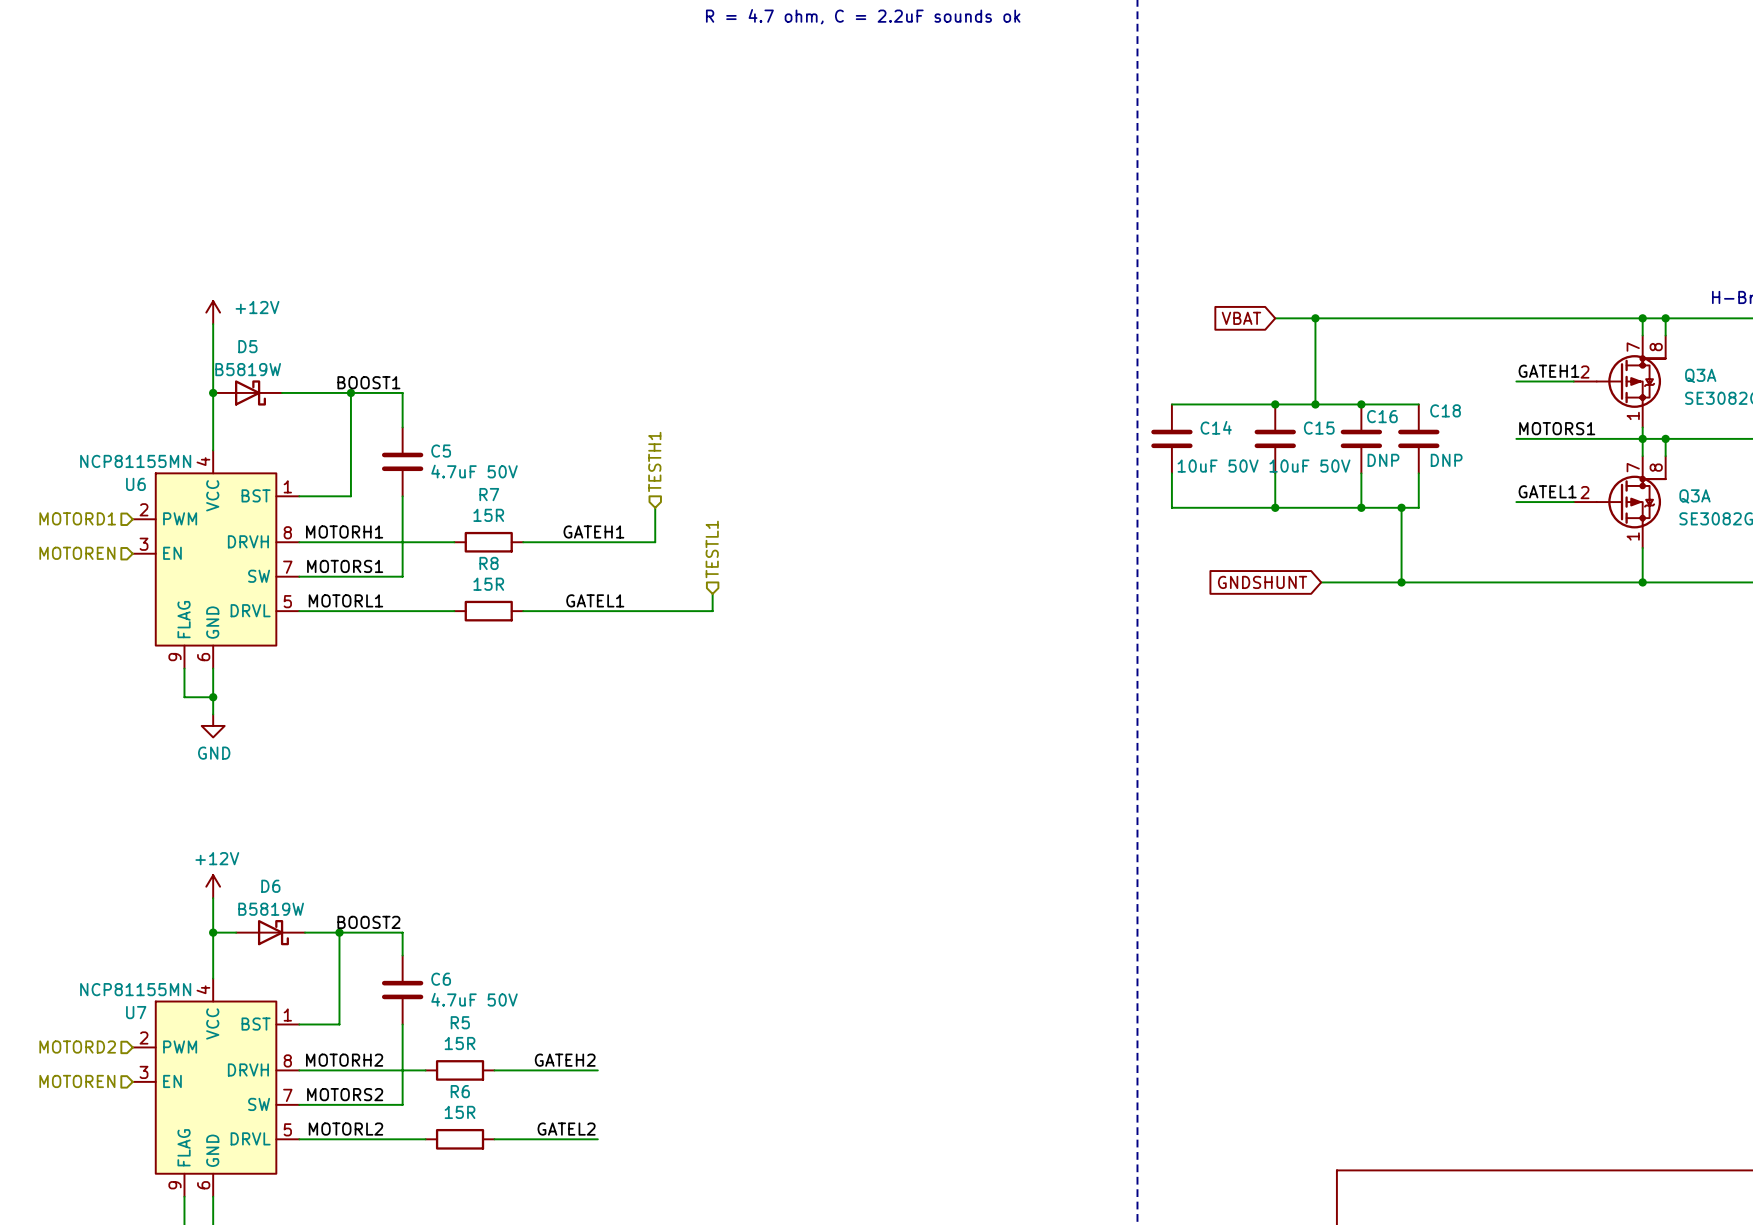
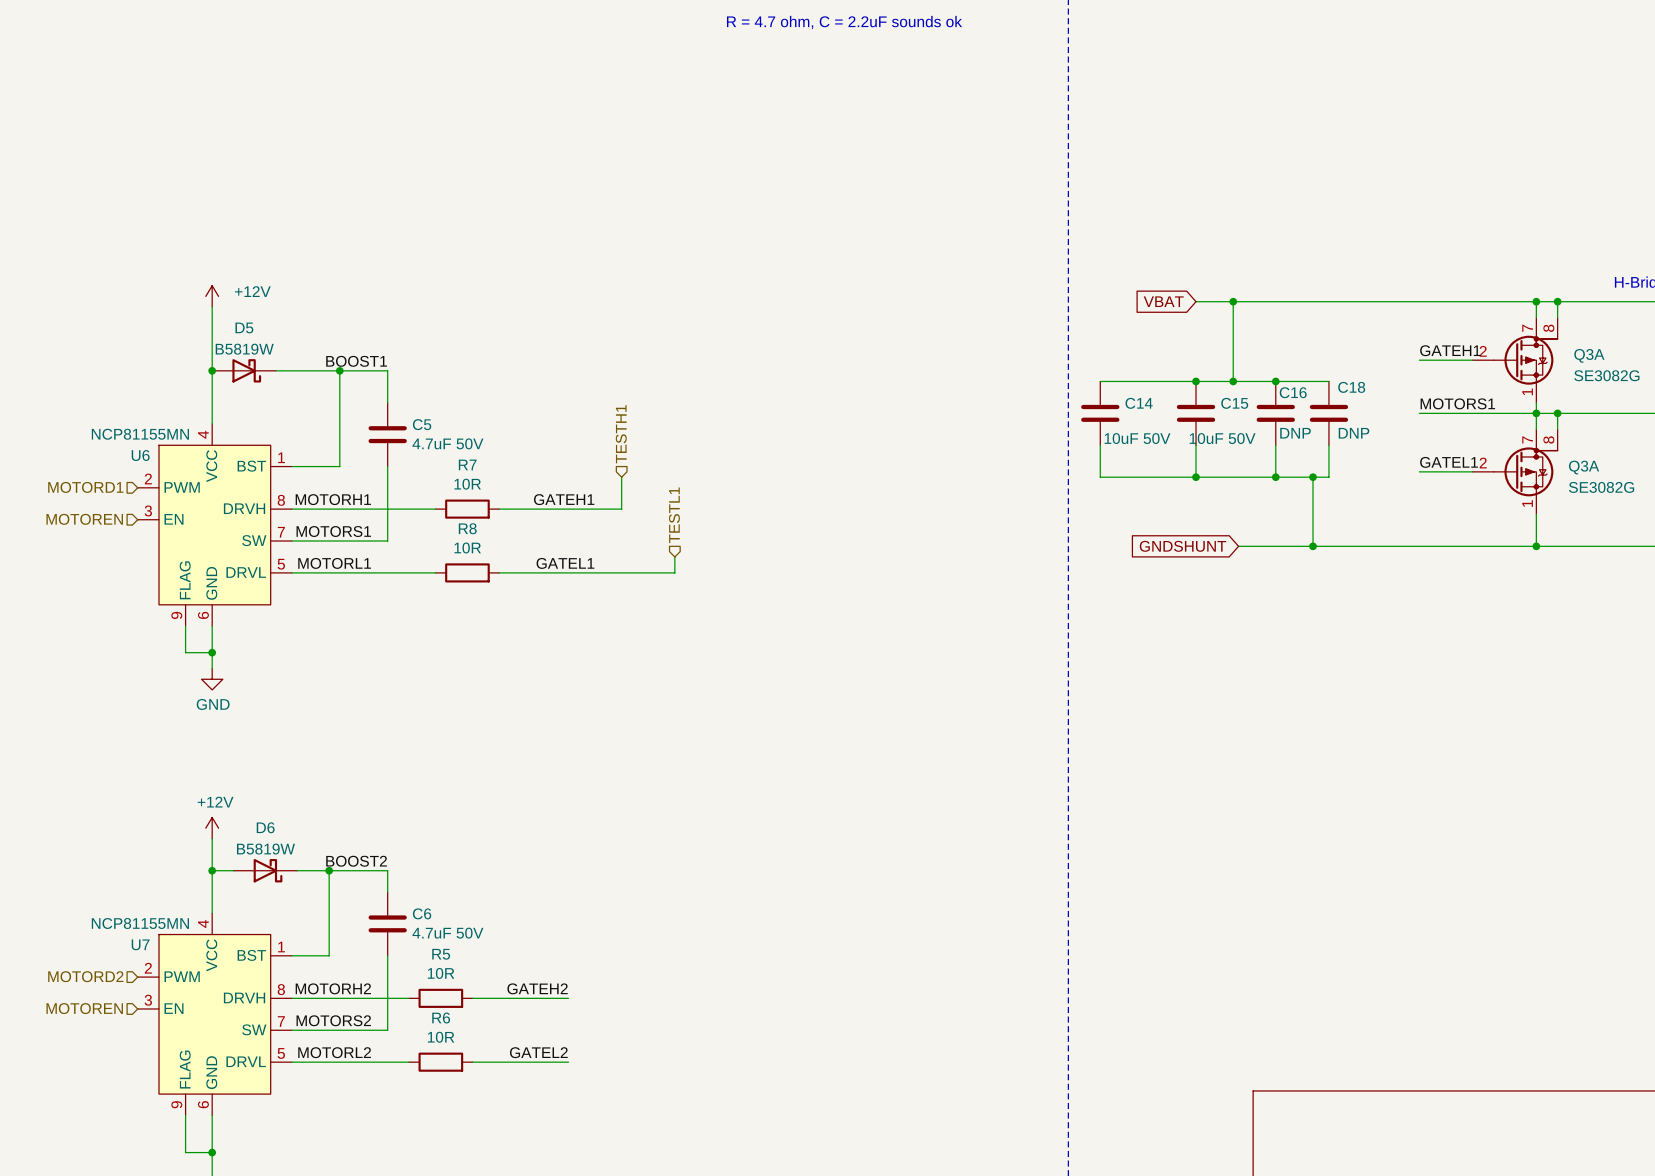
R7 value: 15R (488, 515) -> 10R (467, 484)
R8 value: 15R (488, 584) -> 10R (467, 548)
R5 value: 15R (460, 1043) -> 10R (441, 973)
R6 value: 15R (460, 1112) -> 10R (441, 1037)

